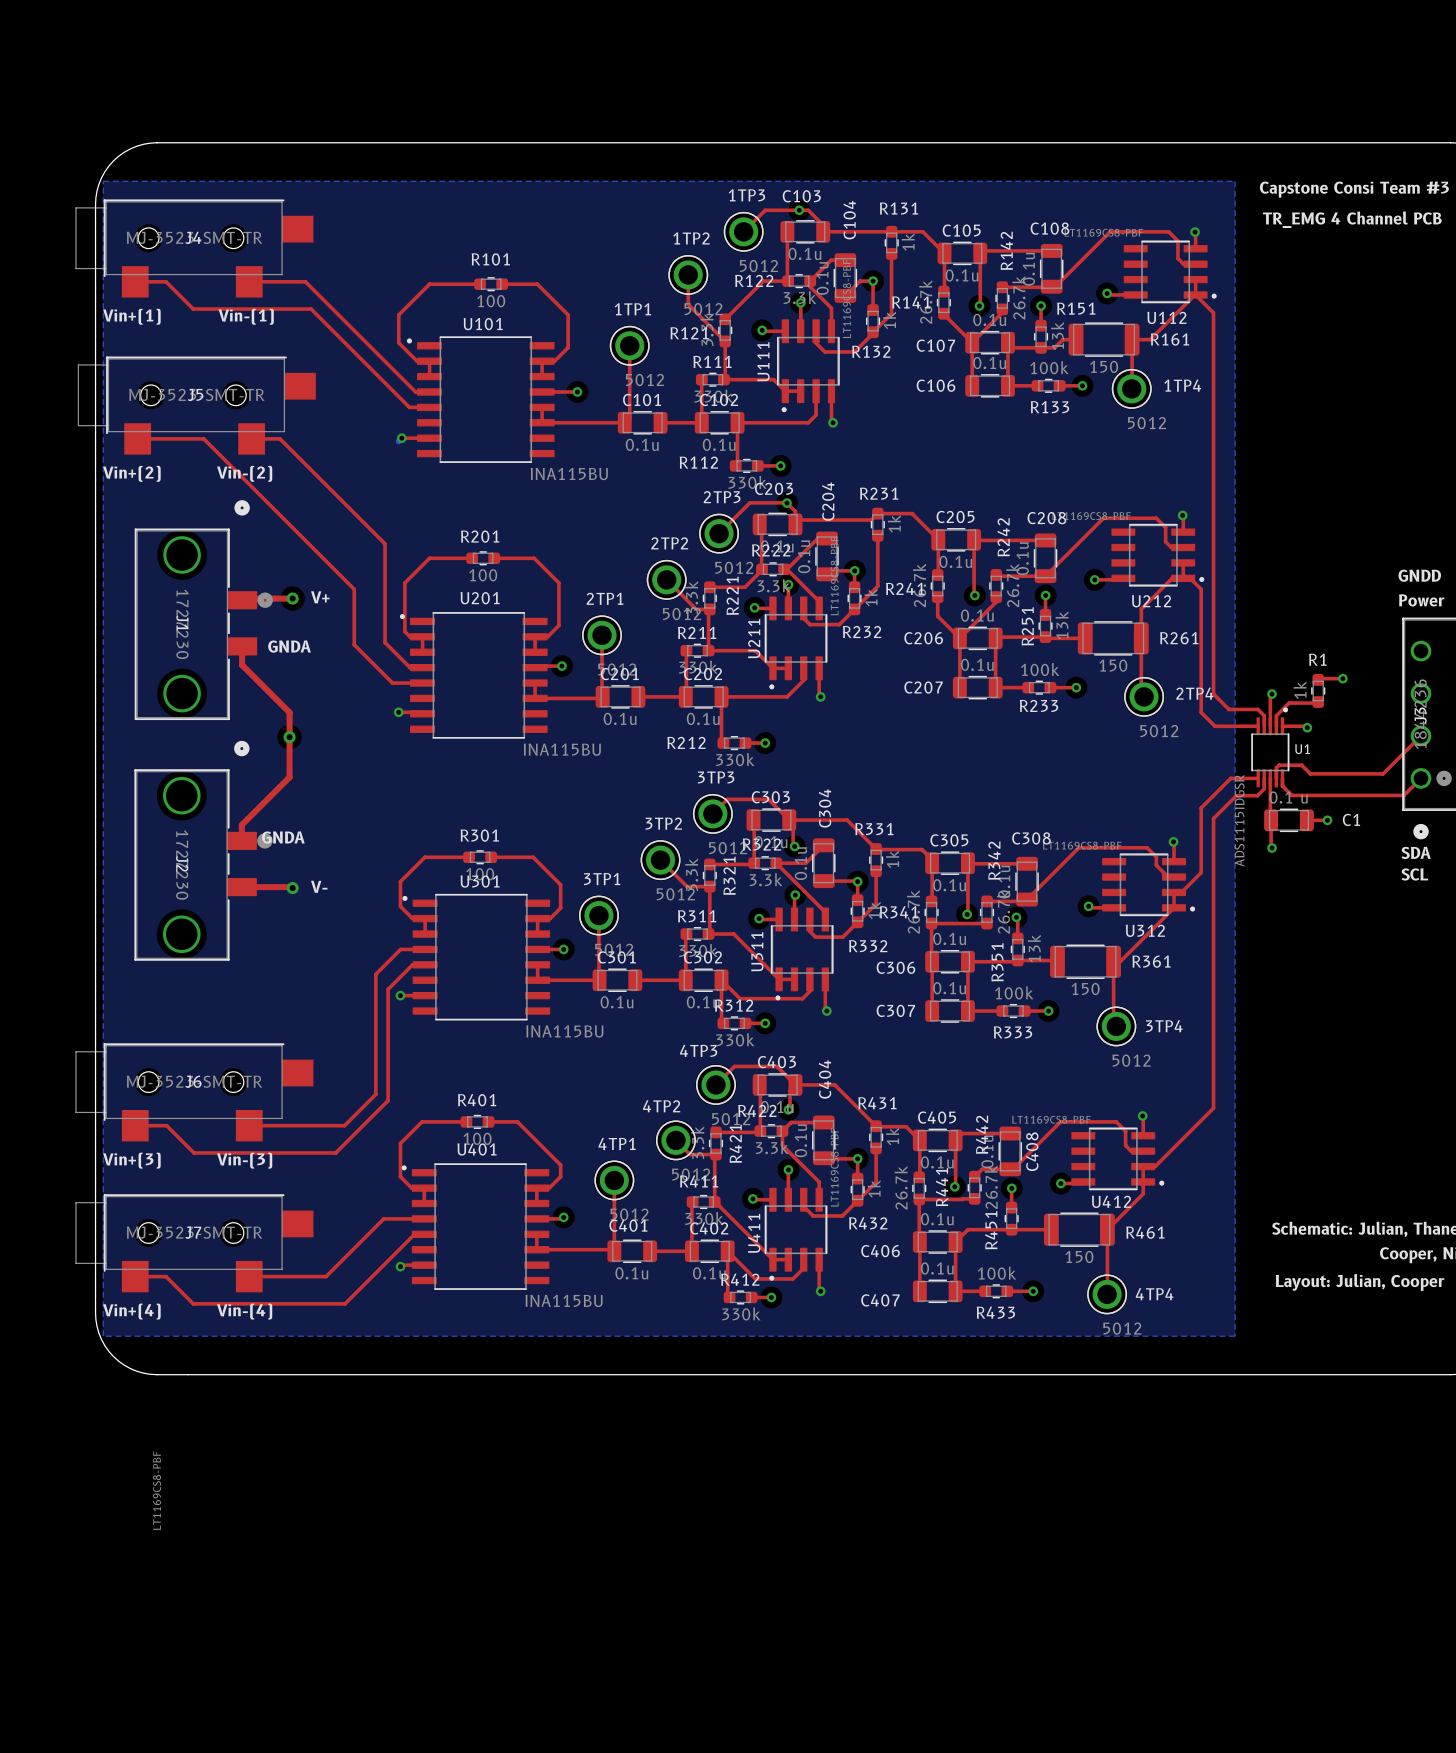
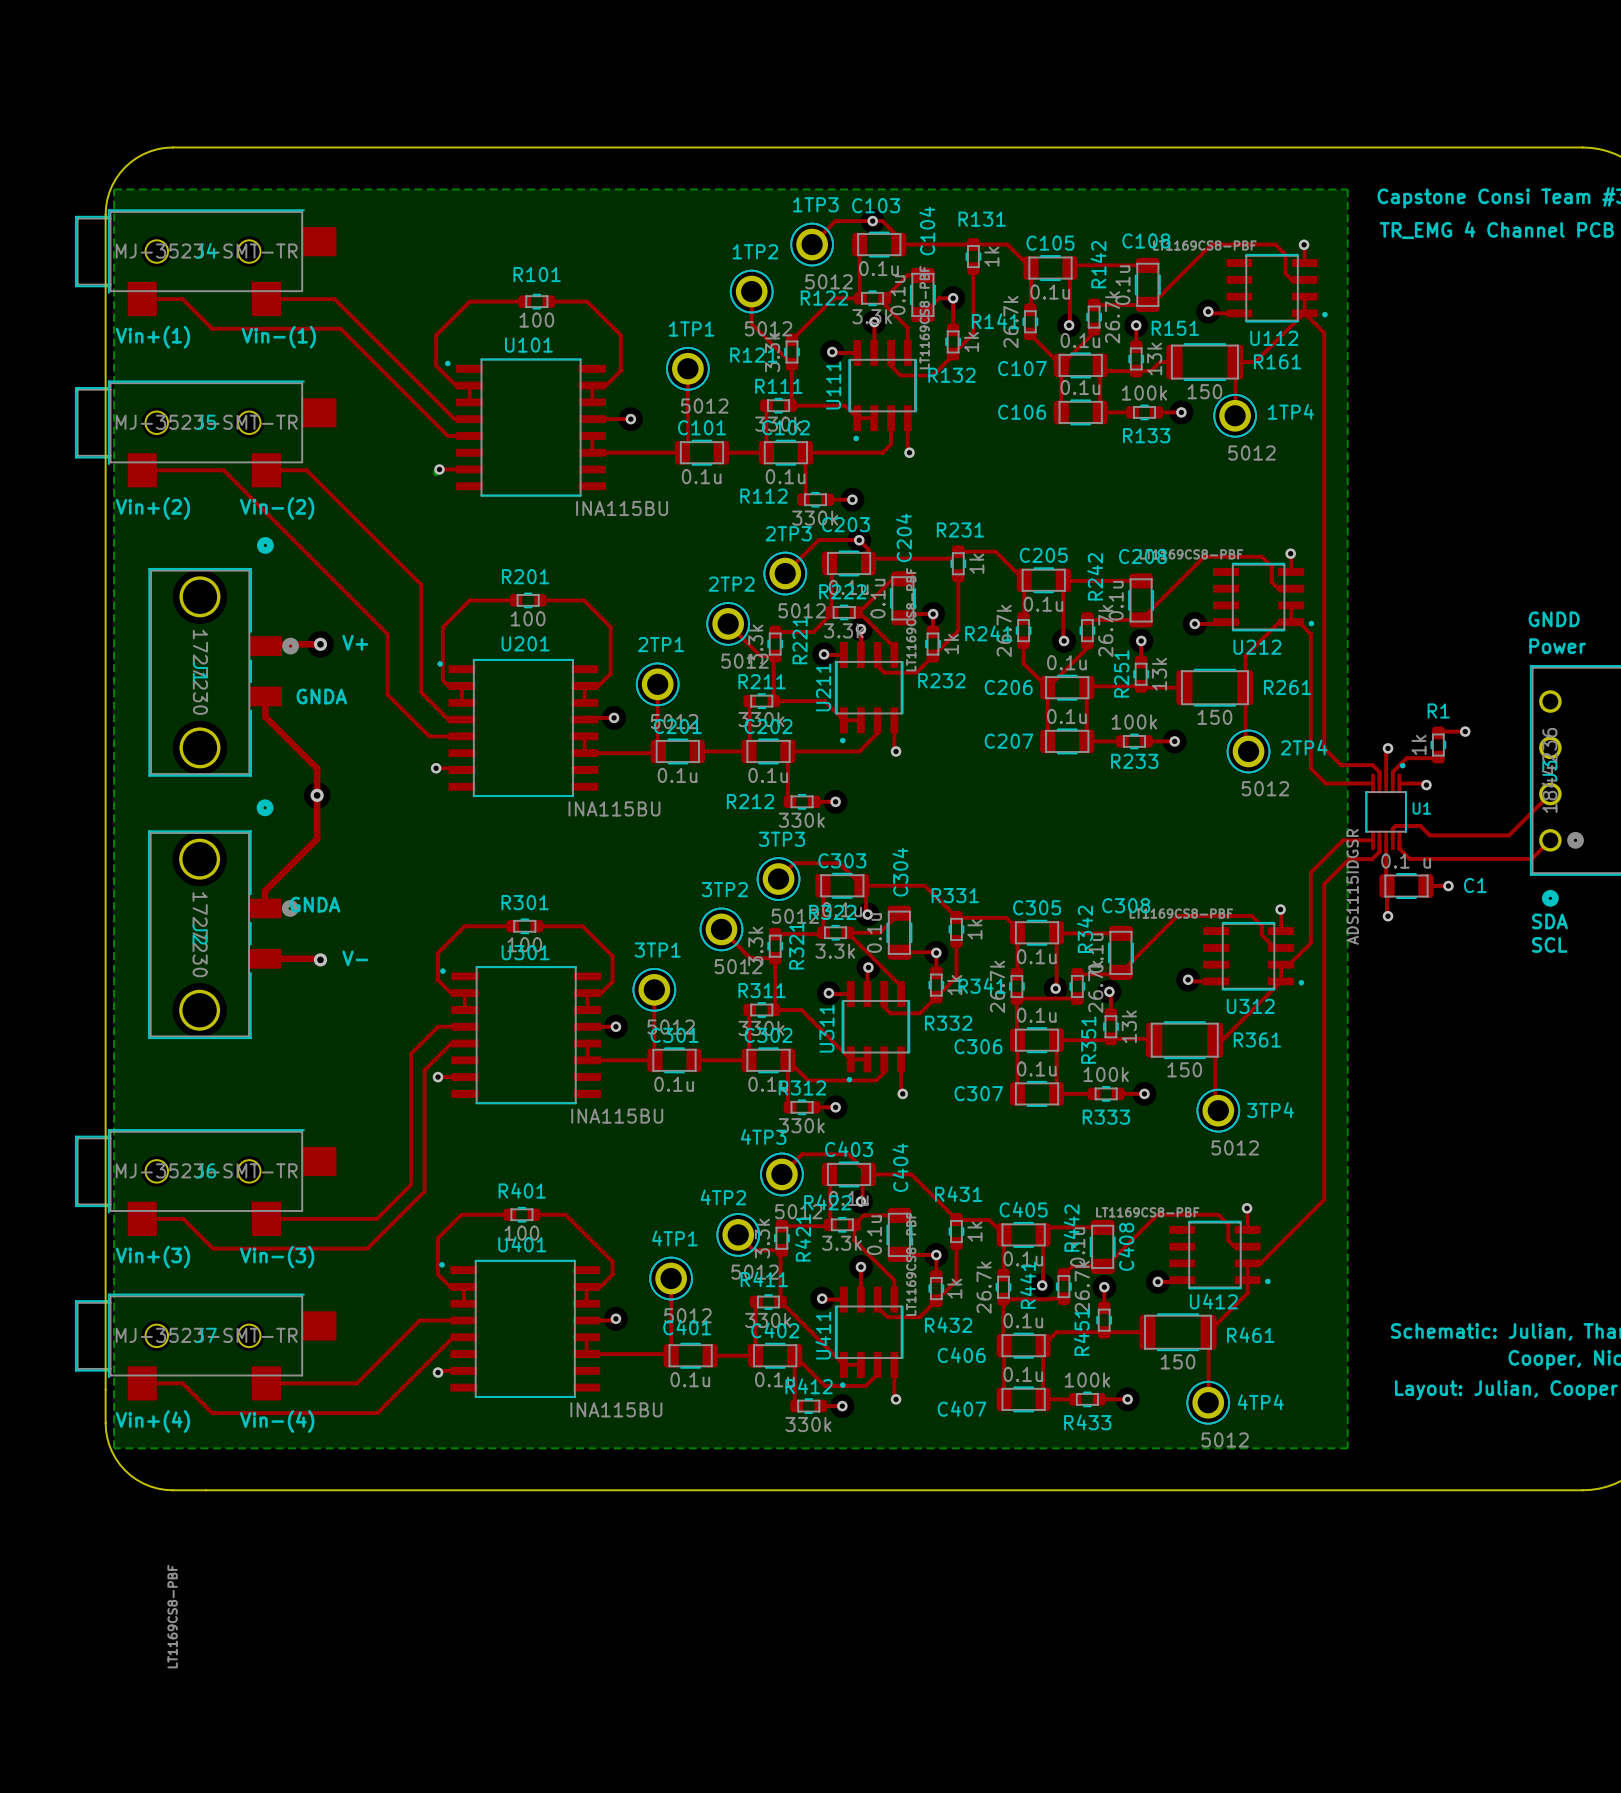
J4 footprint: [75, 199, 314, 298] -> [74, 209, 337, 317]
J5 footprint: [78, 356, 316, 455] -> [74, 380, 337, 488]
J6 footprint: [75, 1043, 314, 1142] -> [74, 1129, 337, 1237]
J7 footprint: [75, 1194, 314, 1293] -> [74, 1293, 337, 1401]

